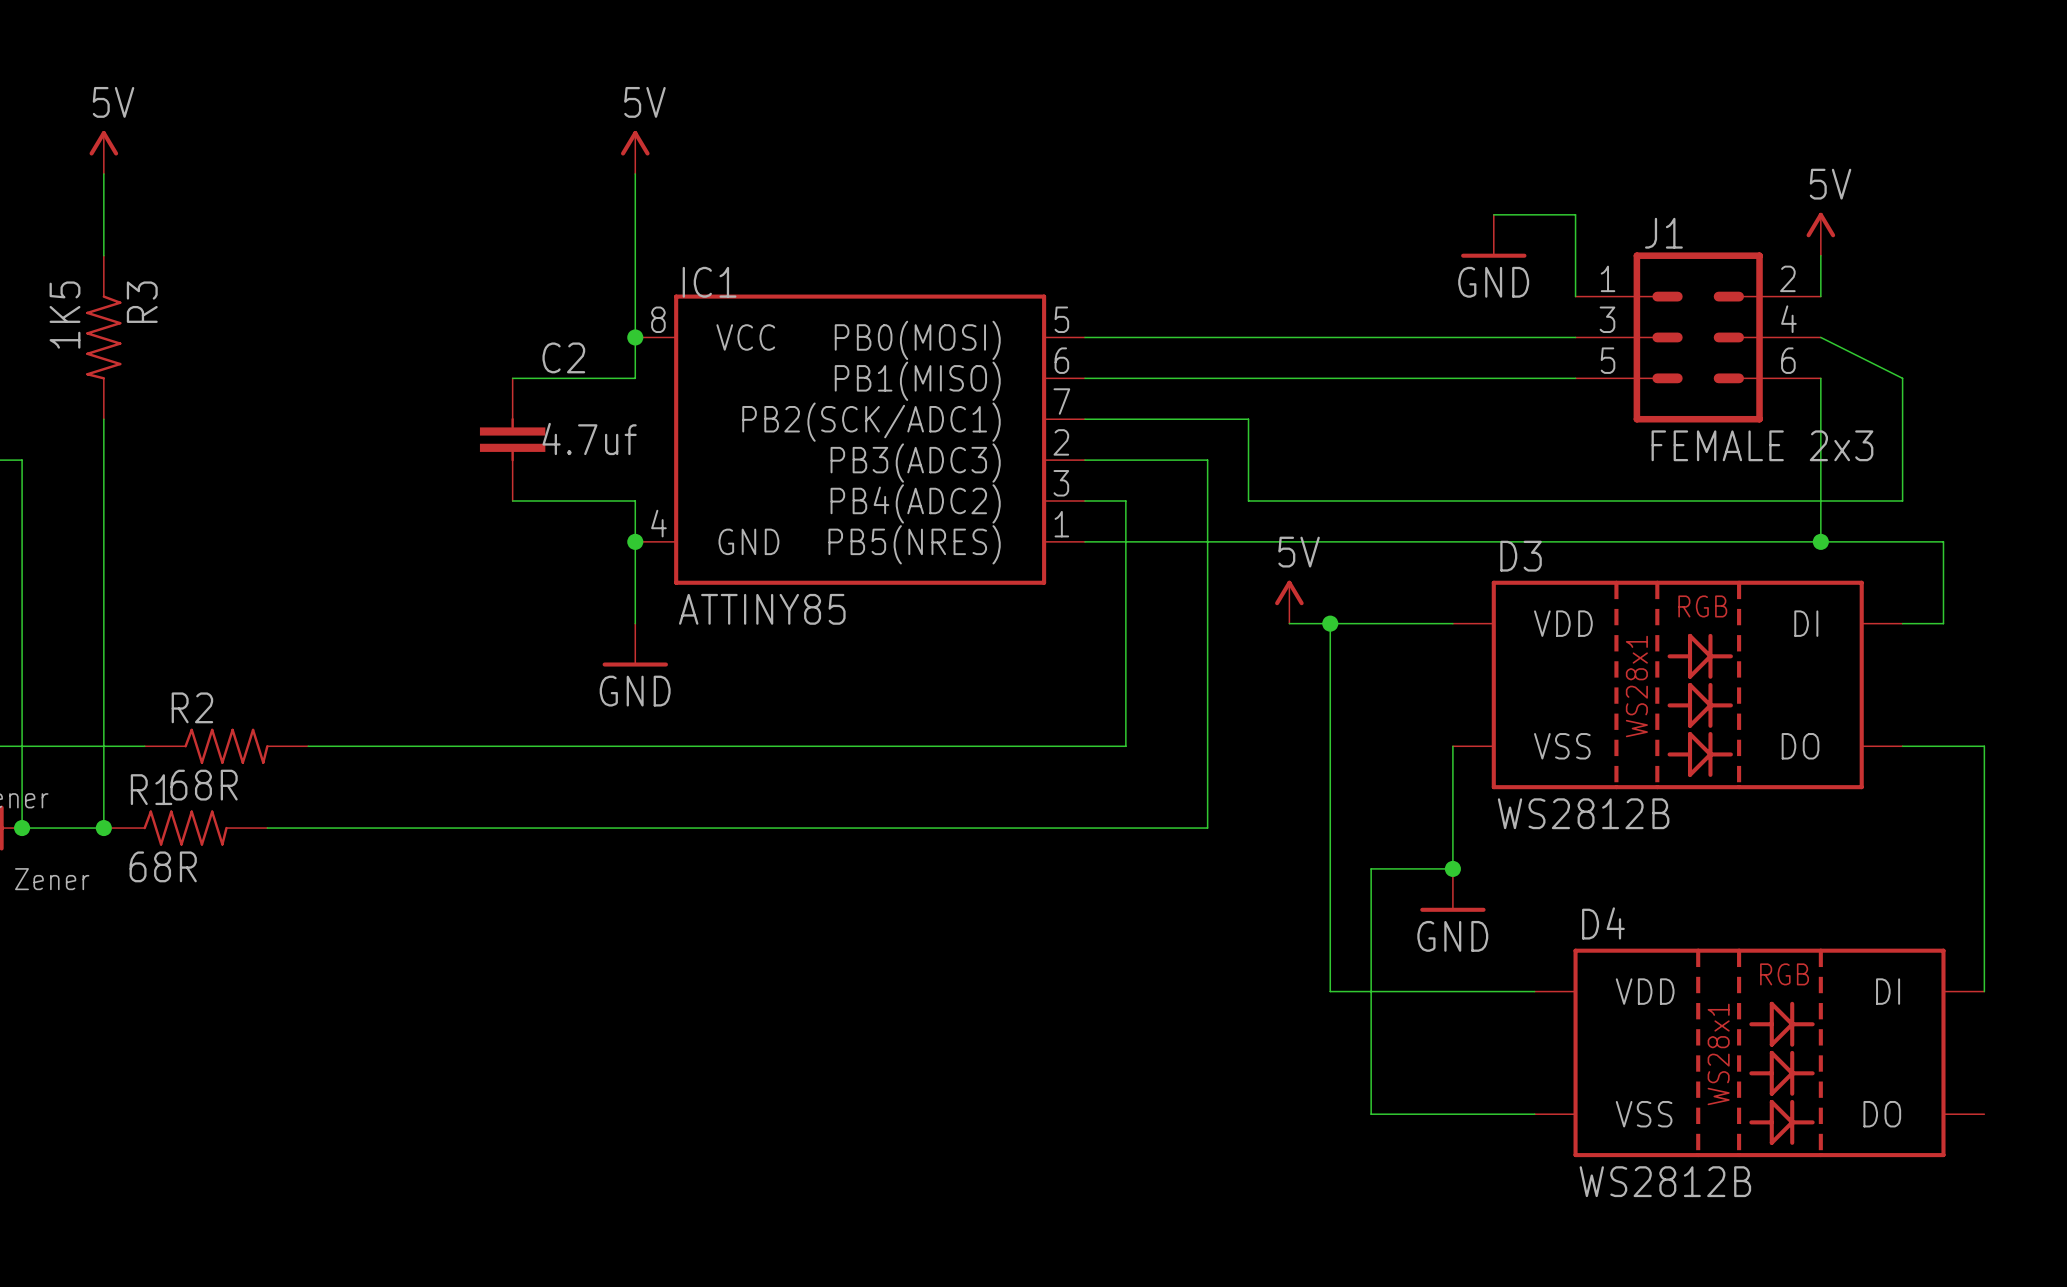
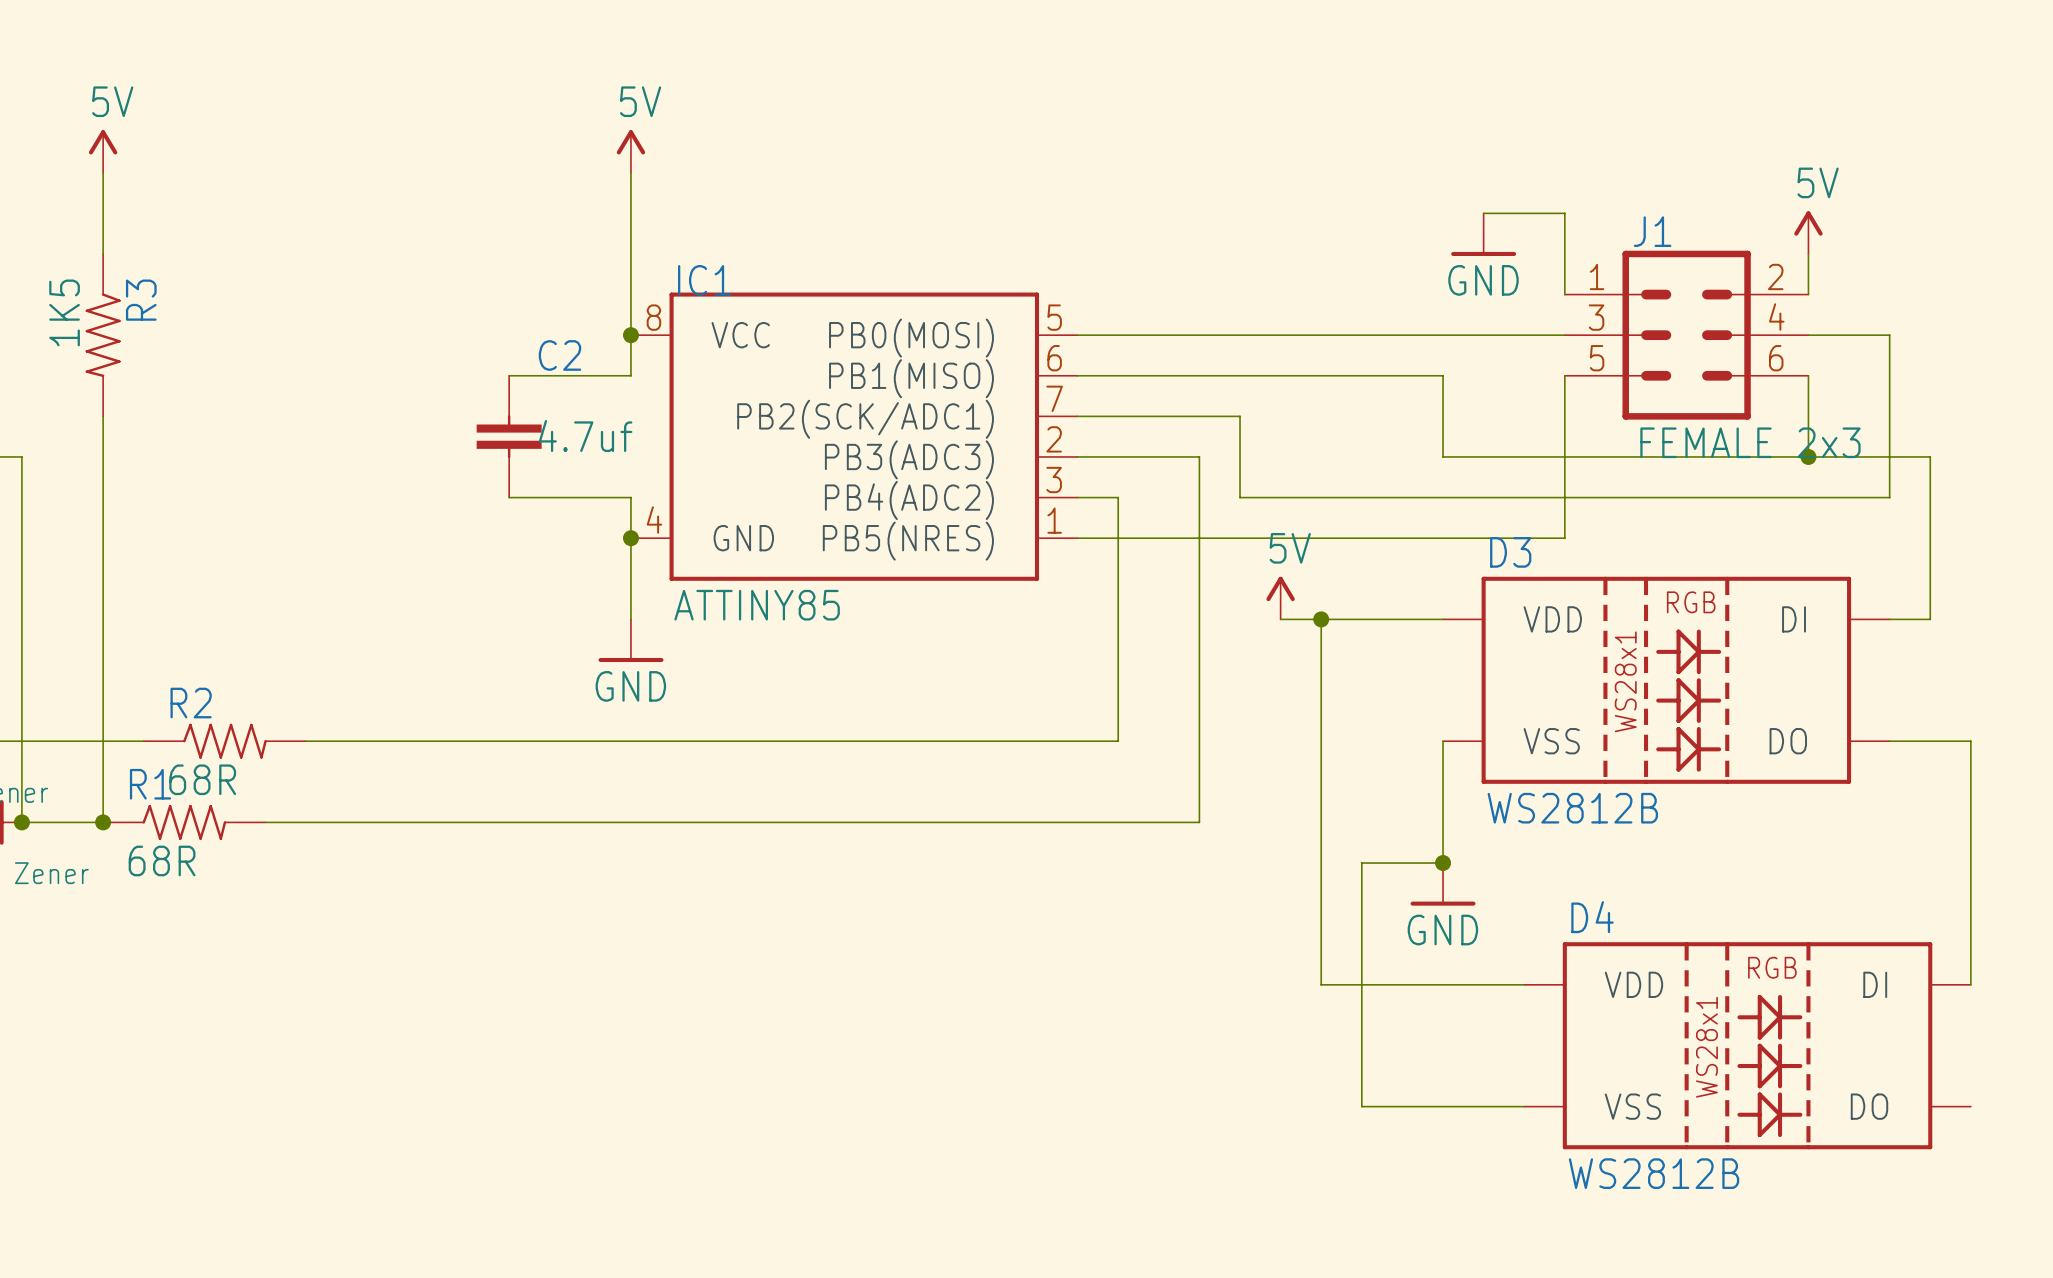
wire: (1820, 337) (1902, 378) -> (1808, 335) (1889, 335) (1889, 375)
wire: (1452, 378) (1575, 378) -> (1564, 538) (1564, 375)
wire: (1820, 460) (1820, 541) -> none
wire: (1575, 541) (1943, 541) -> (1443, 375) (1443, 456) (1930, 456) (1930, 538)
junction position: (1820, 541) -> (1808, 456)

